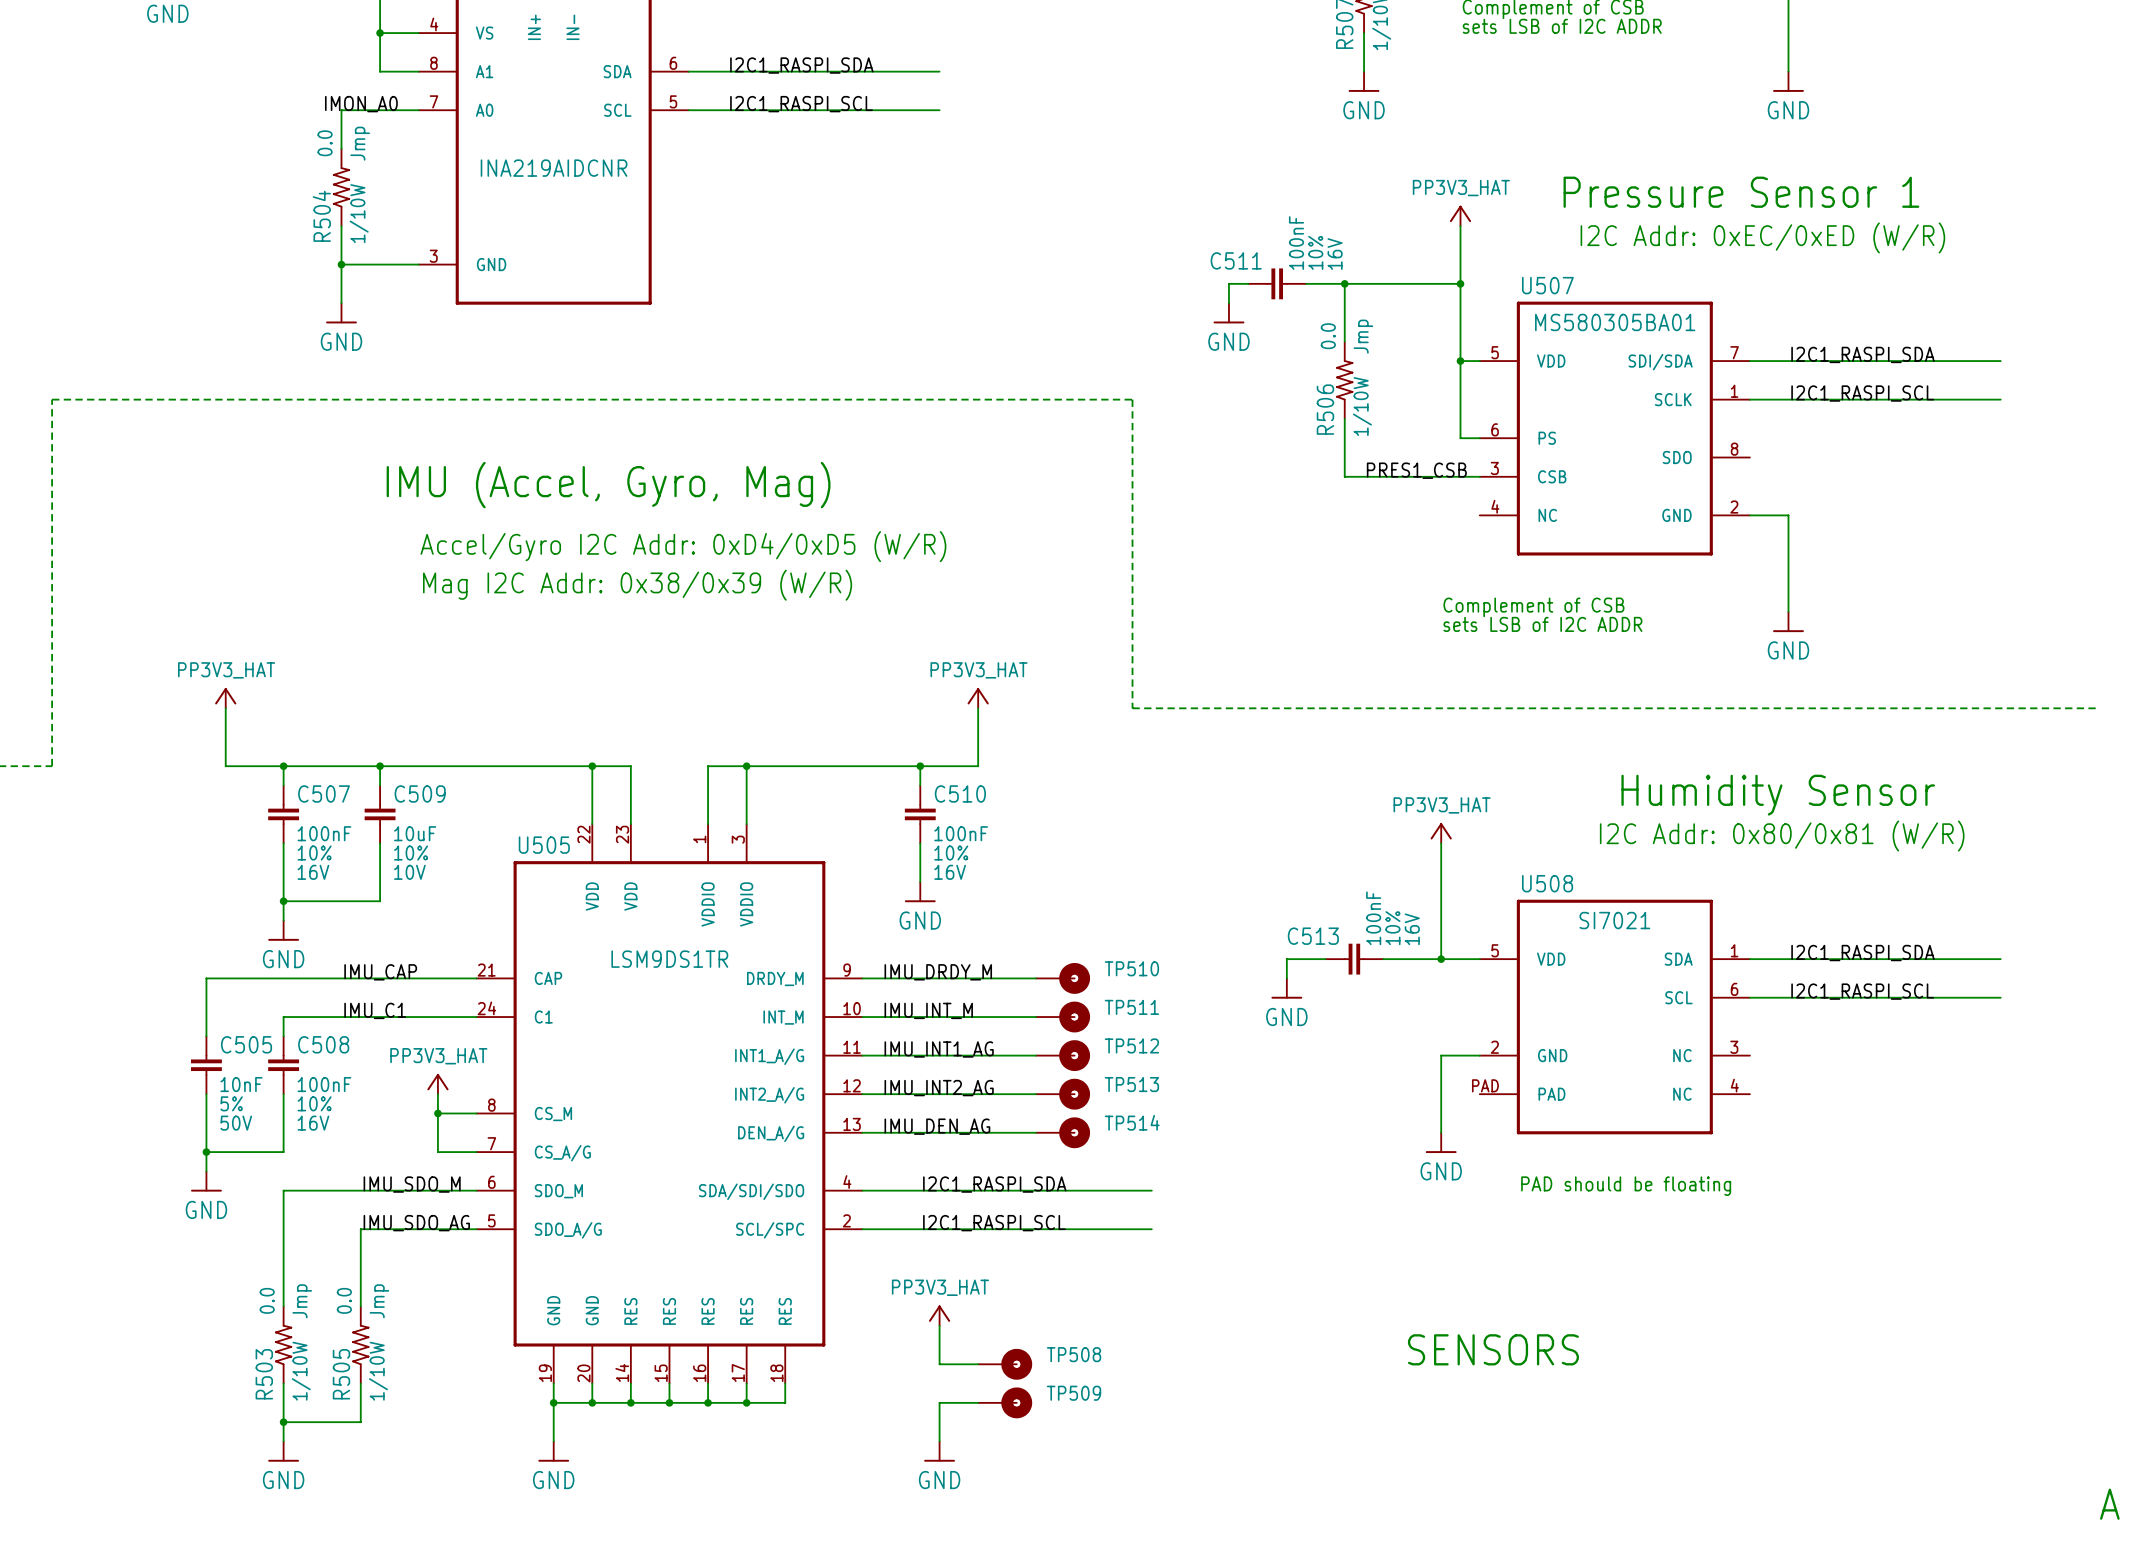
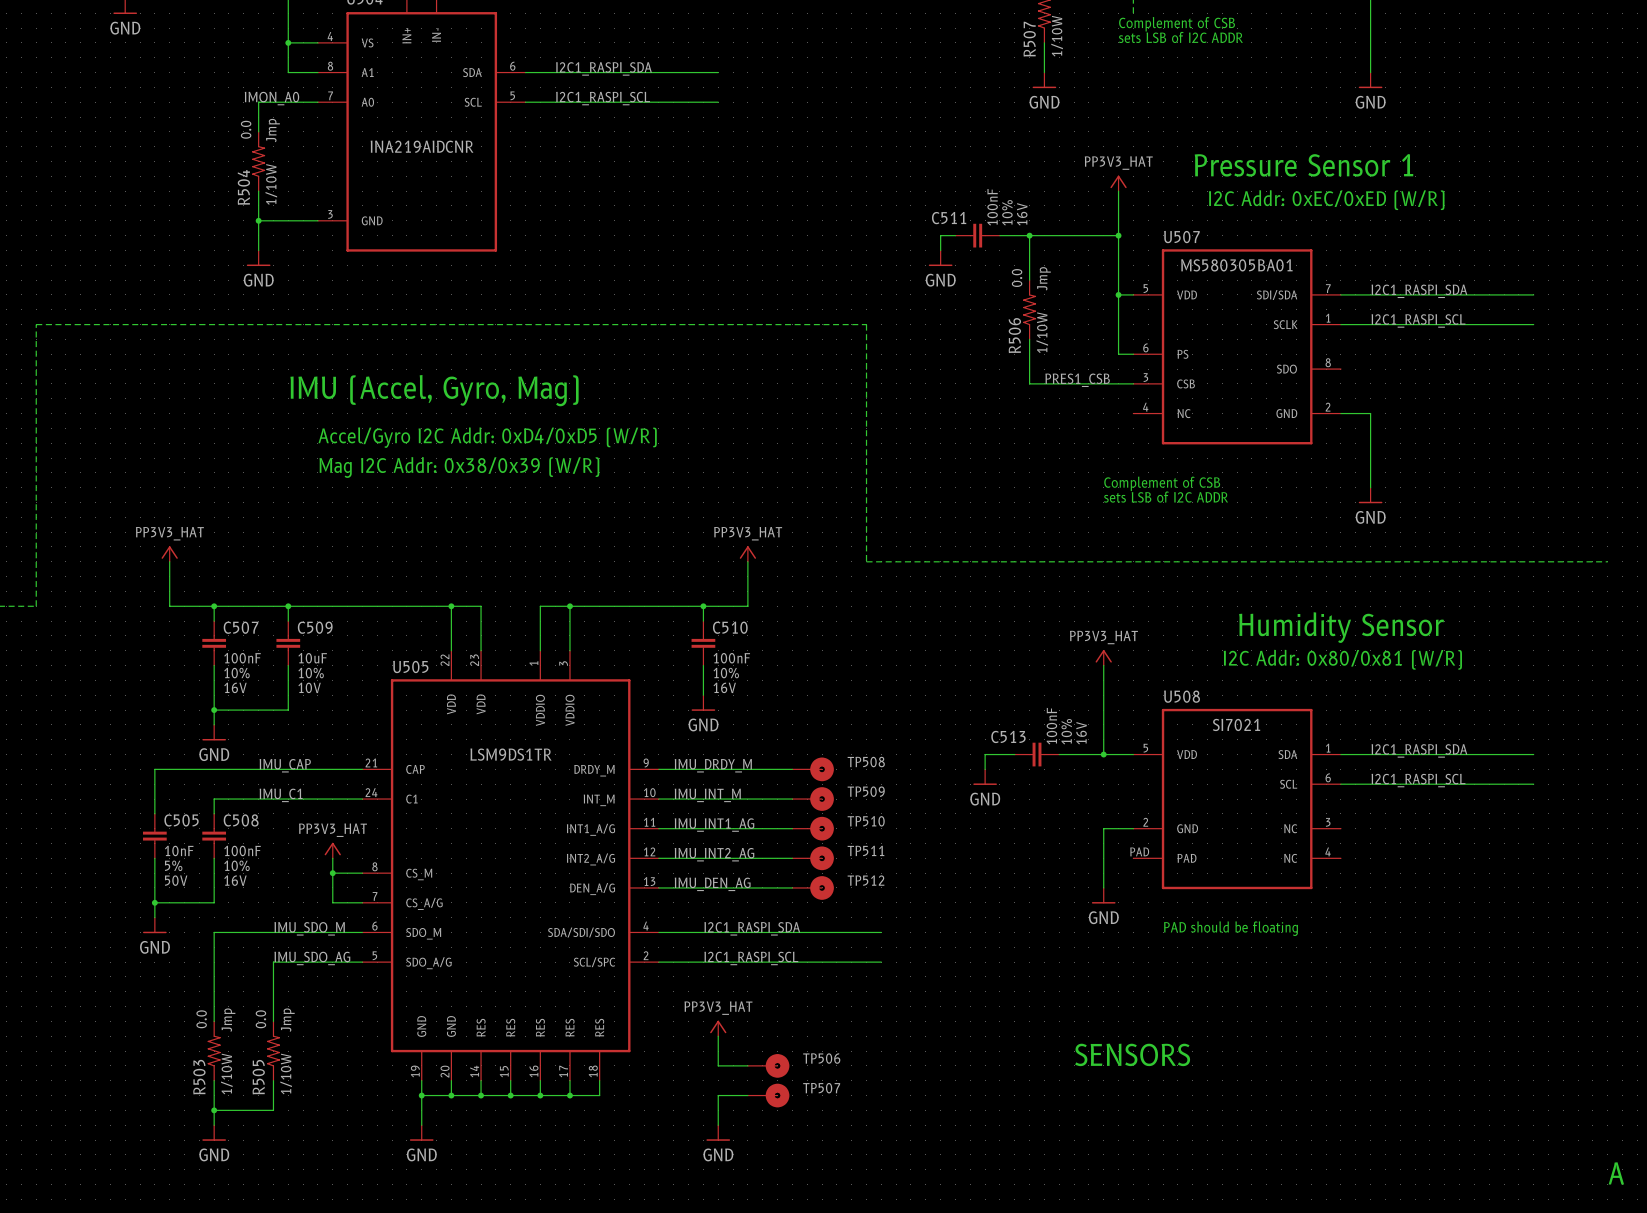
TP510 name: TP510 (1131, 968) -> TP508 (866, 762)
TP511 name: TP511 (1131, 1007) -> TP509 (866, 791)
TP512 name: TP512 (1131, 1045) -> TP510 (866, 821)
TP513 name: TP513 (1131, 1084) -> TP511 (865, 850)
TP514 name: TP514 (1132, 1122) -> TP512 (866, 880)
TP508 name: TP508 (1074, 1354) -> TP506 (821, 1058)
TP509 name: TP509 (1074, 1393) -> TP507 (821, 1088)

